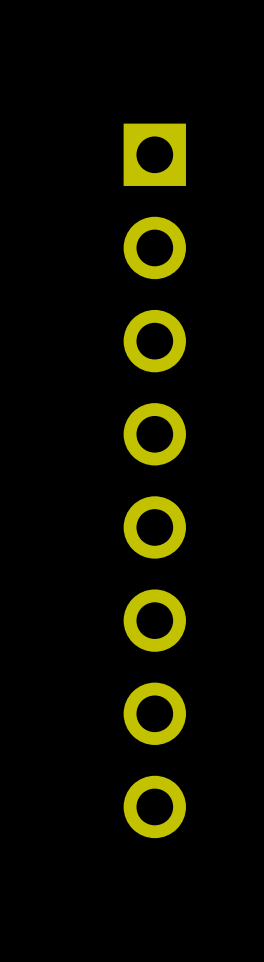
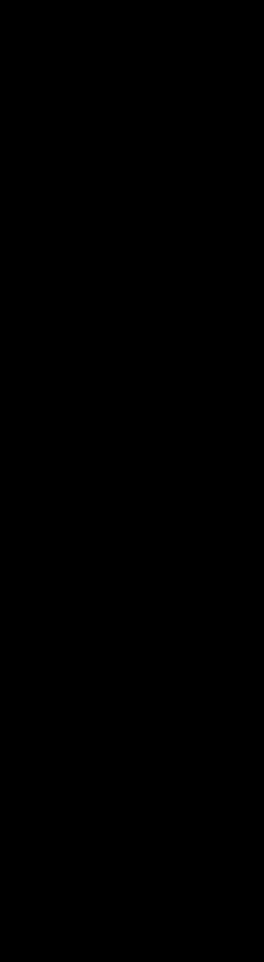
part: (154, 480) -> none

